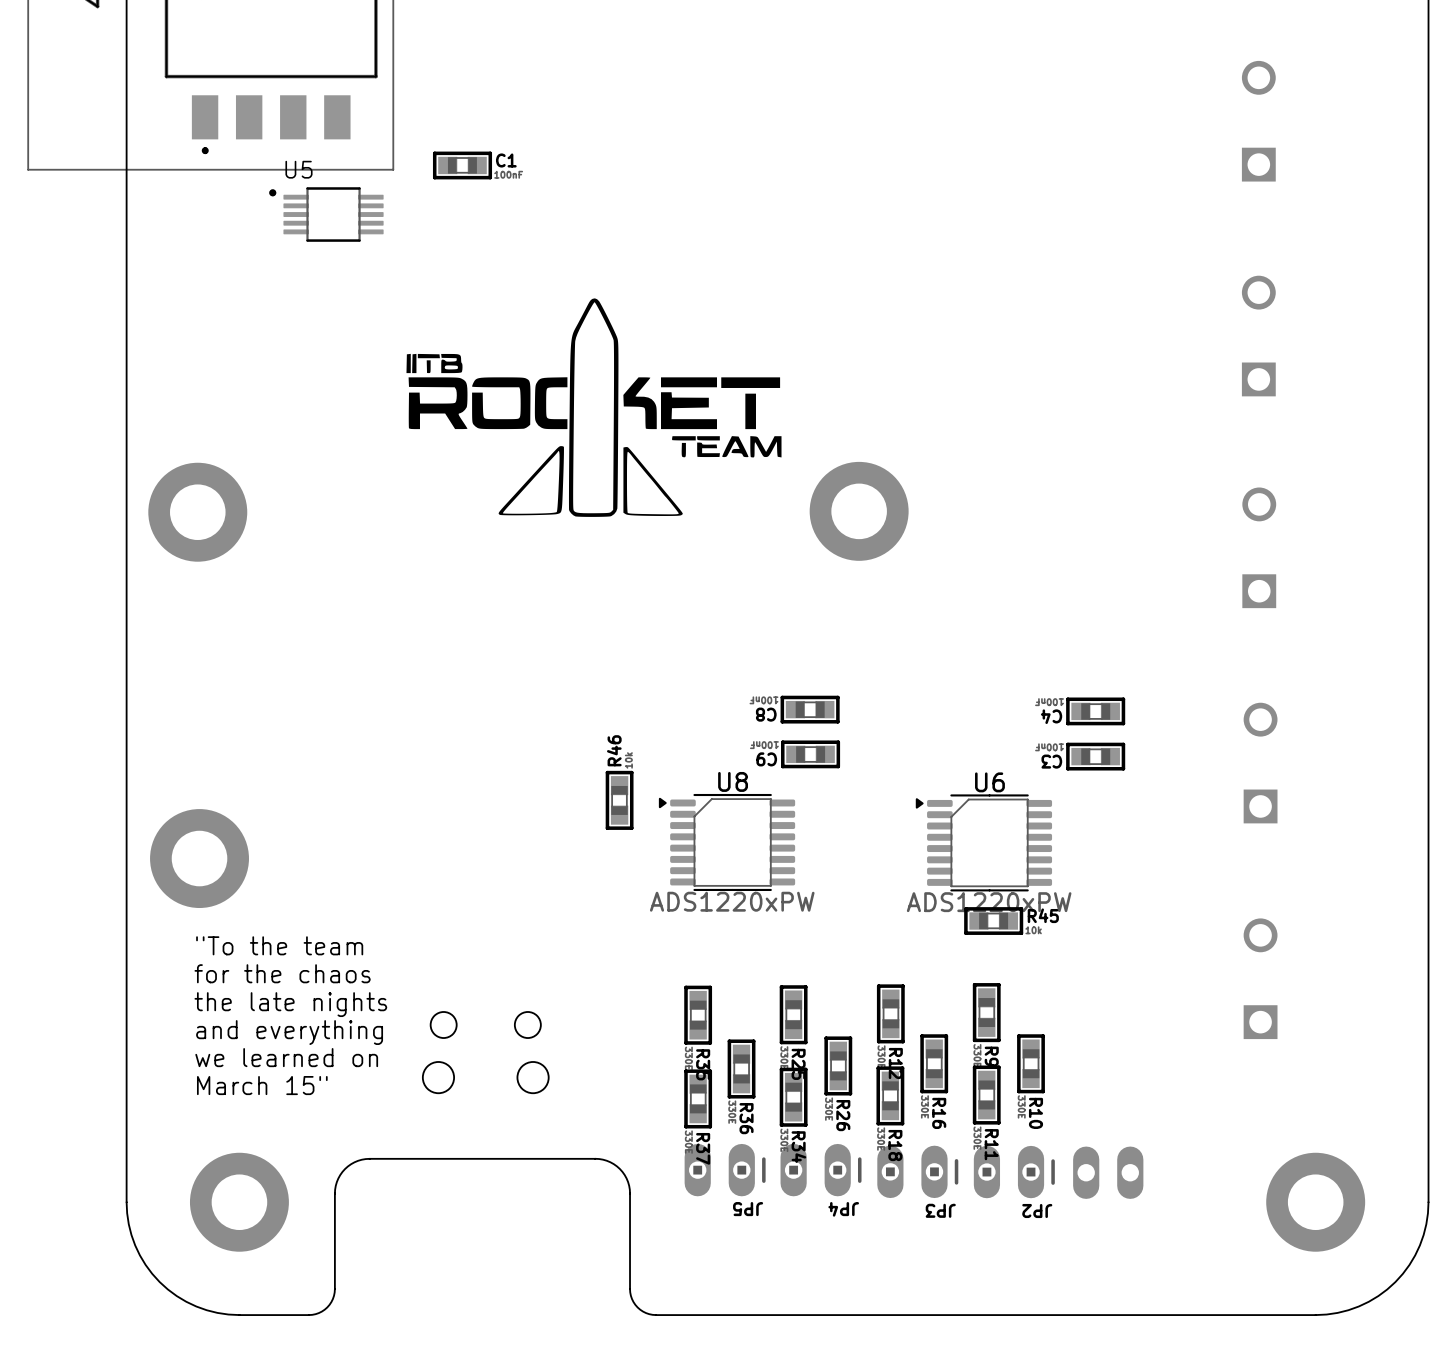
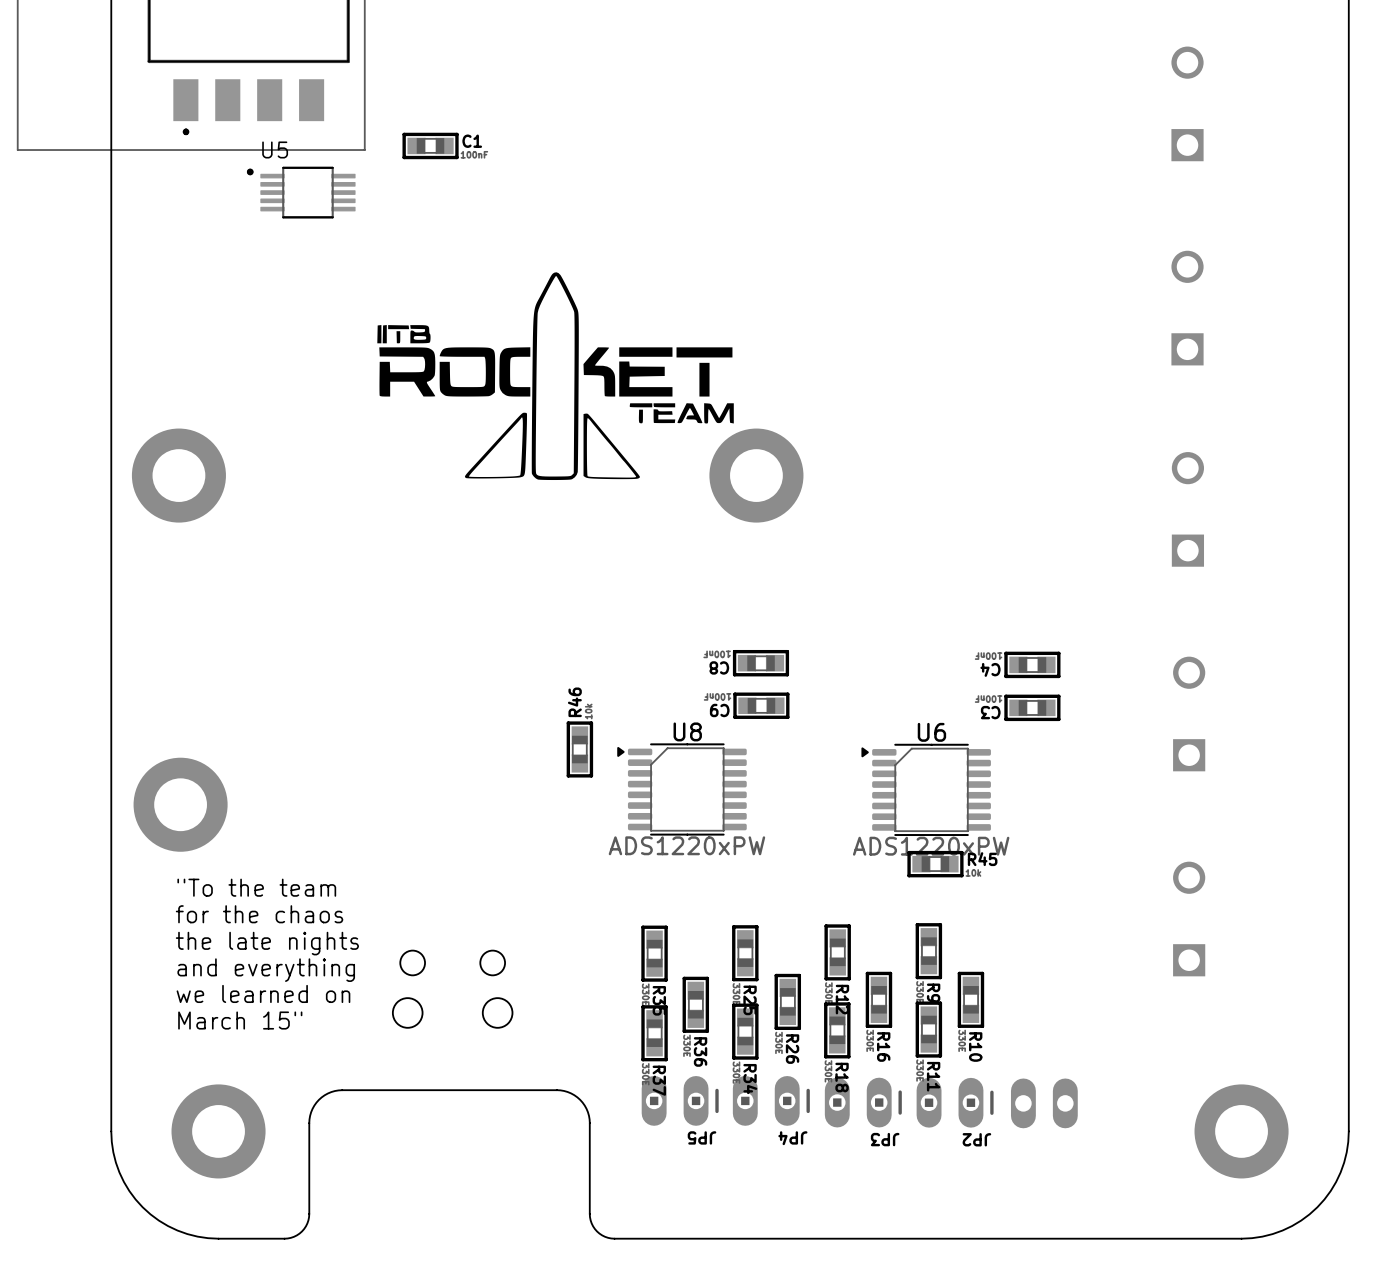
part position: (859, 511) -> (756, 475)

